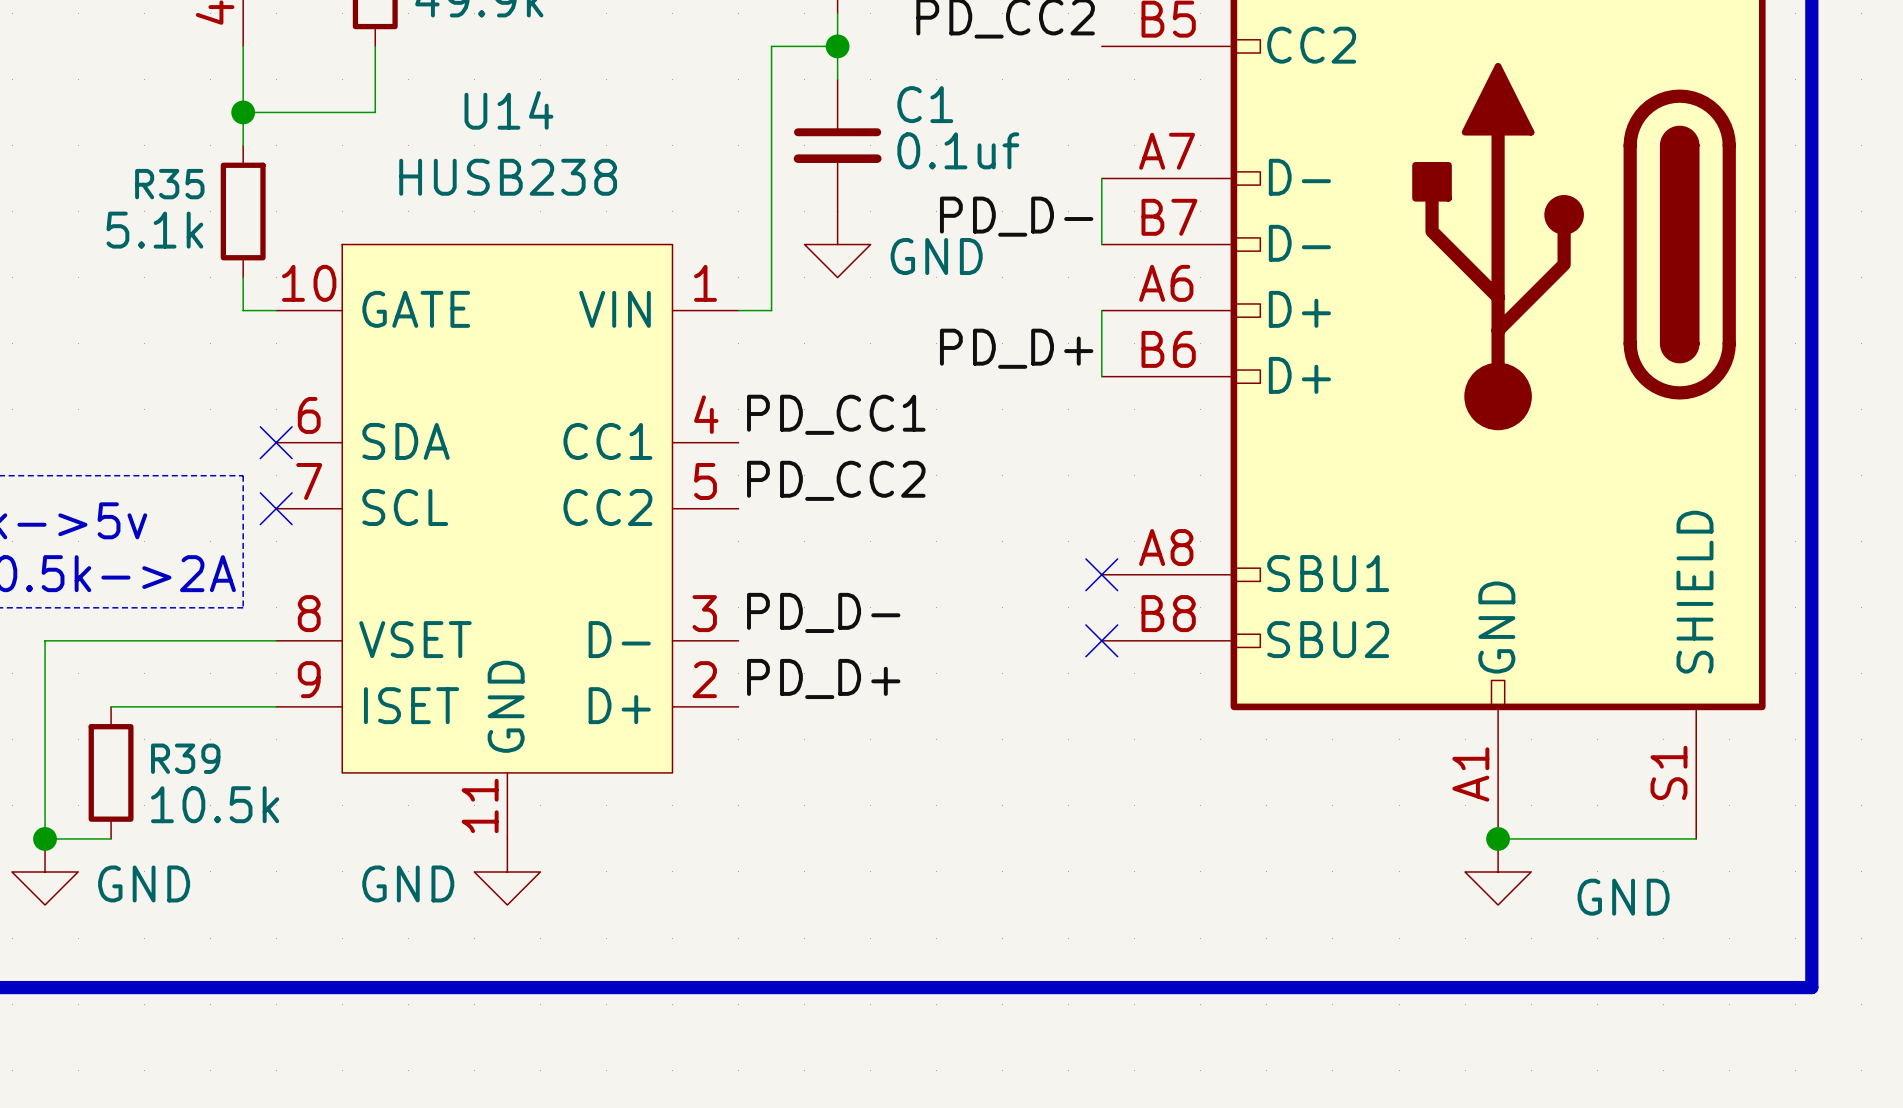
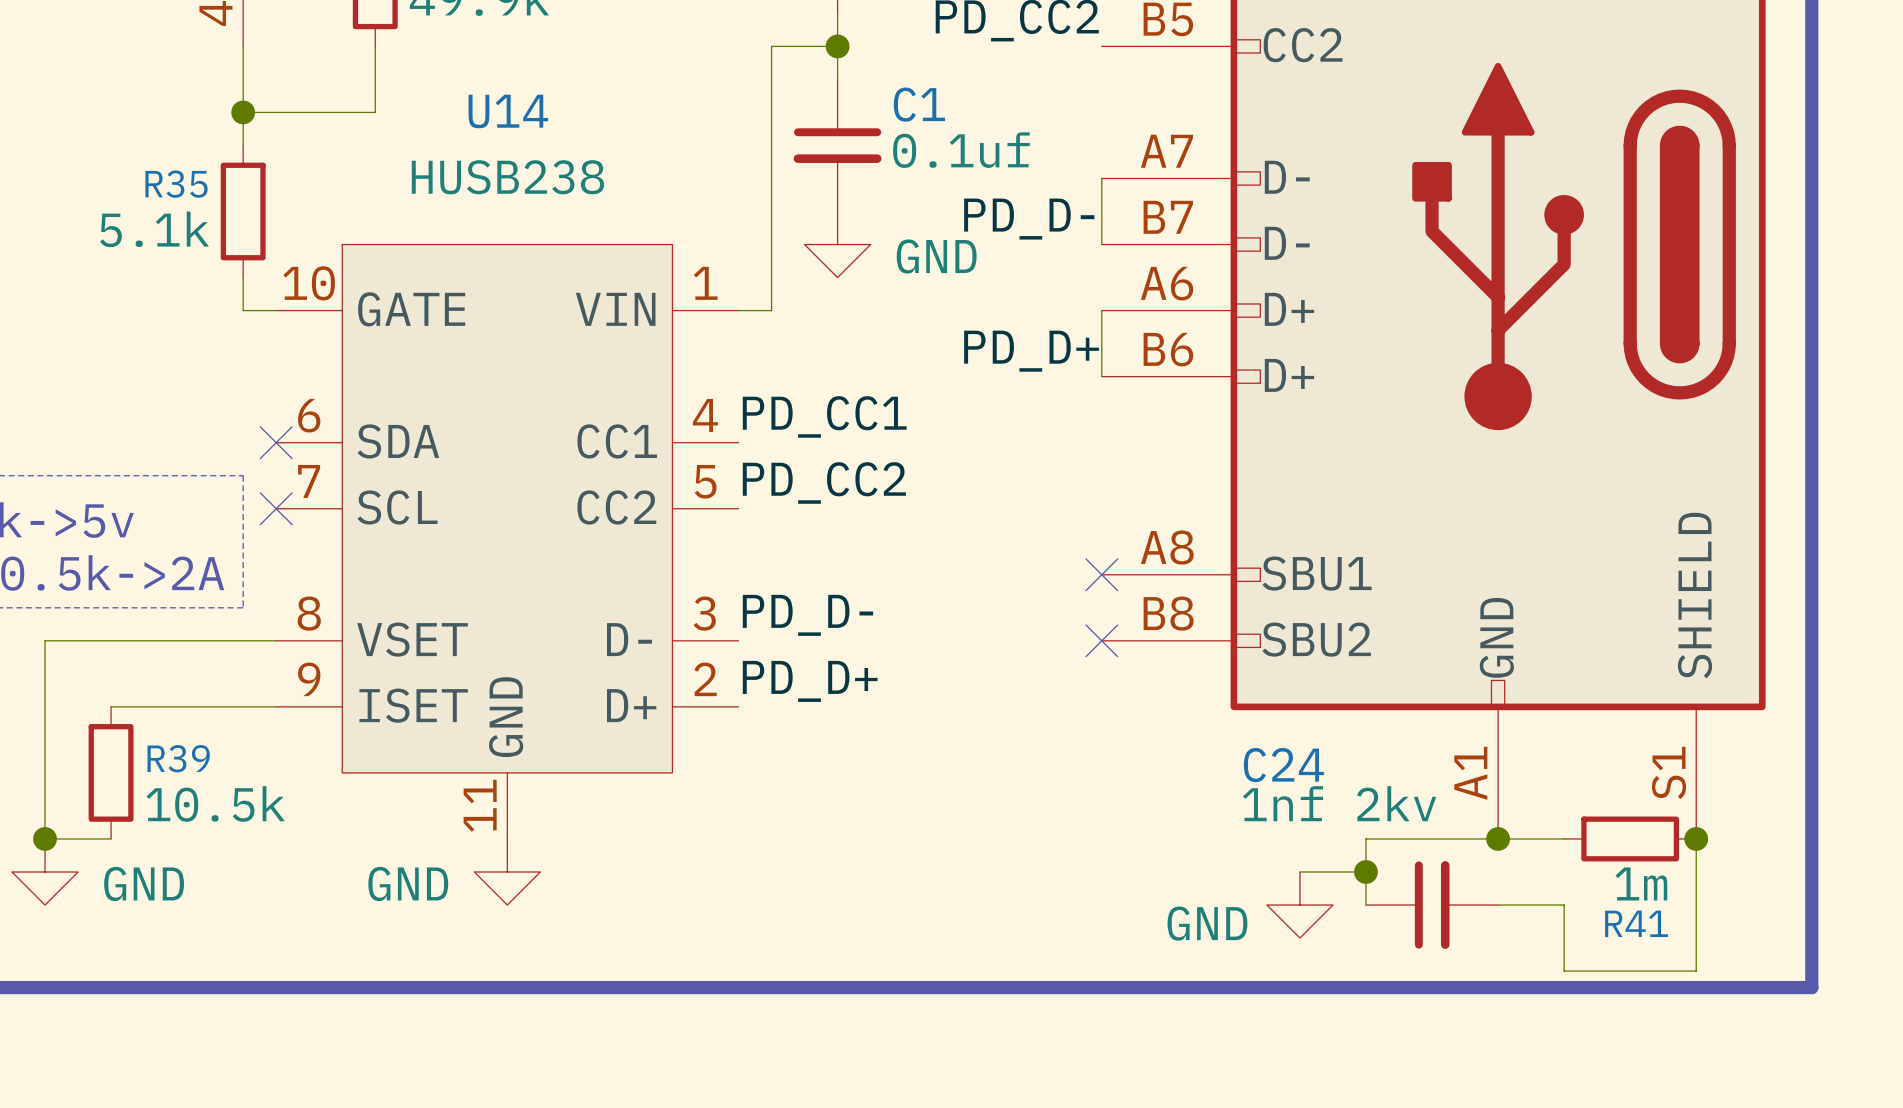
wire: none -> (1498, 838) (1365, 838) (1365, 905)
wire: (1564, 838) (1696, 838) -> (1498, 905) (1564, 905) (1564, 971) (1696, 971) (1696, 838)
R41: none -> 1m (1630, 838)
junction: none -> (1696, 838)
wire: none -> (1299, 871) (1365, 871)
junction: none -> (1365, 871)
power symbol position: GND (1498, 871) -> GND (1299, 905)
power symbol text position: GND (1623, 897) -> GND (1207, 923)
C24: none -> 1nf 2kv (1432, 905)

